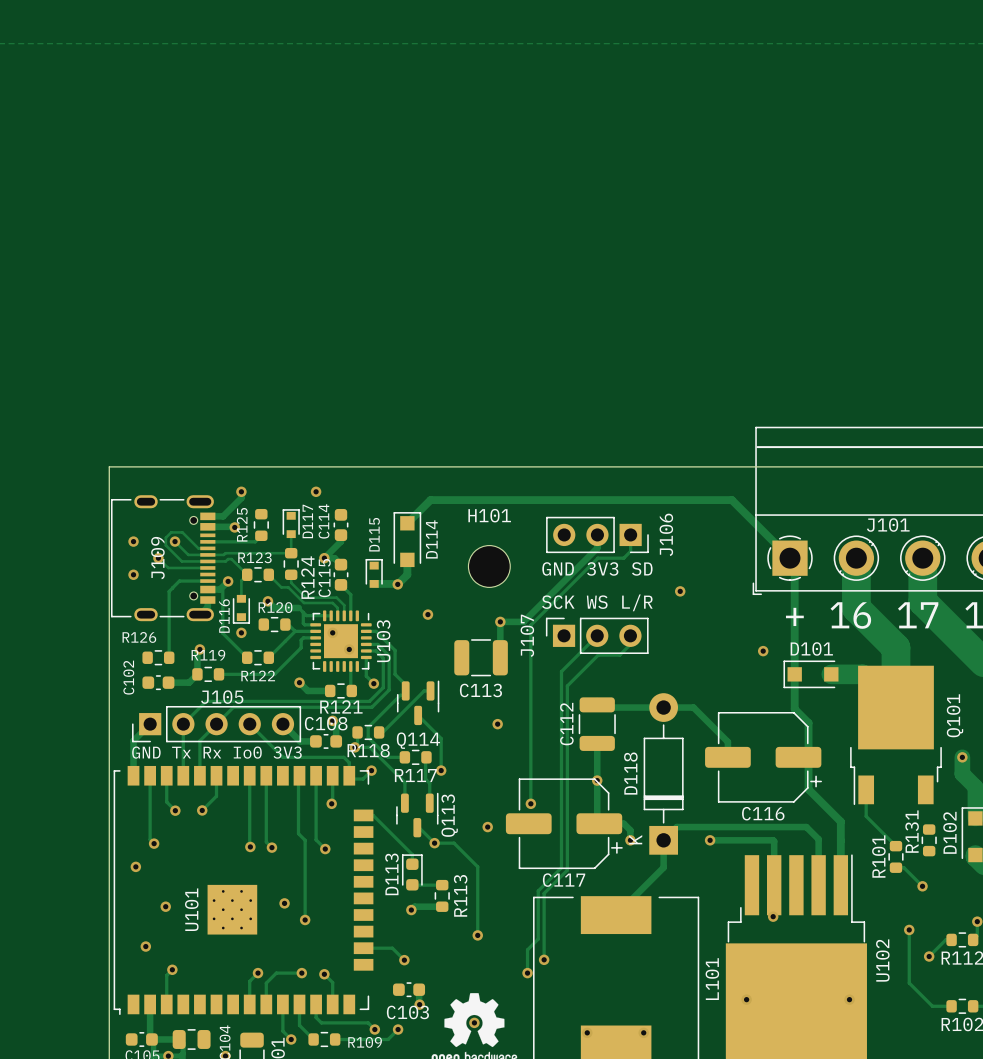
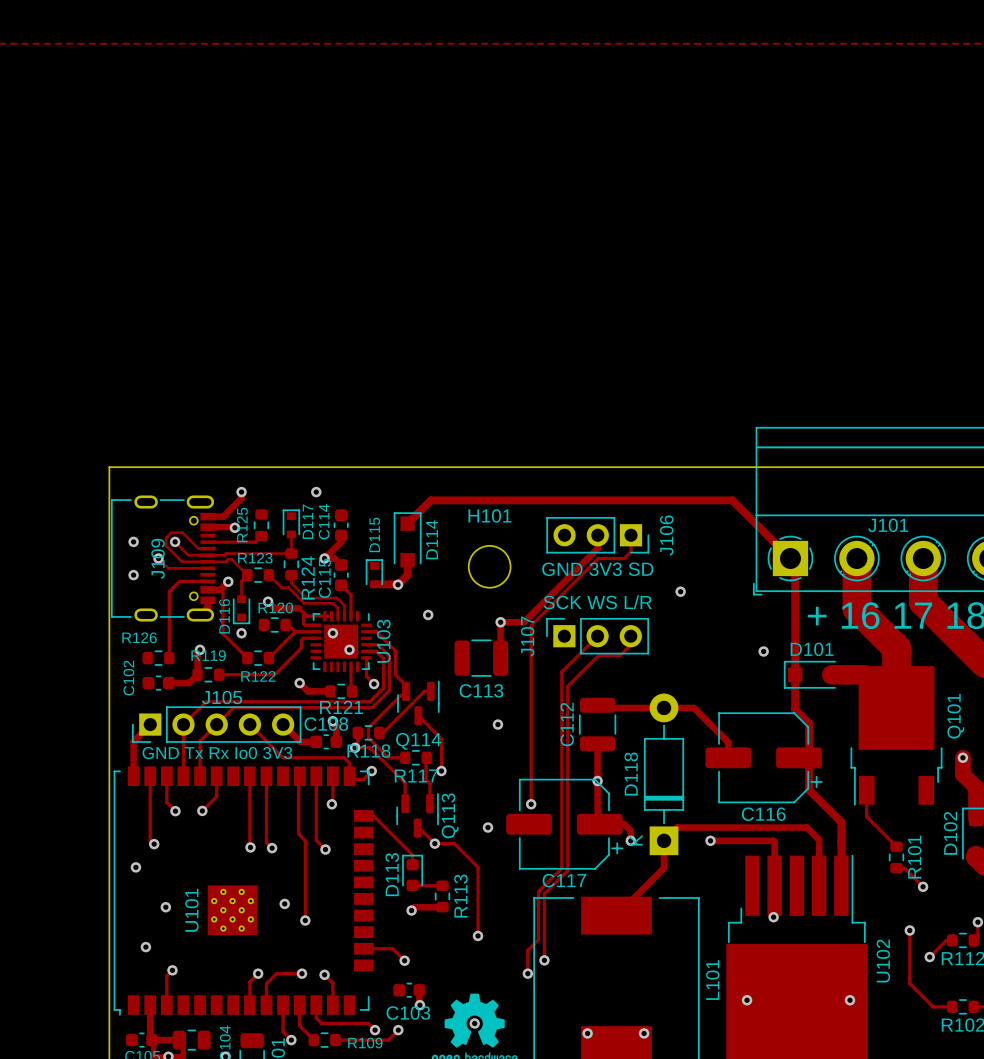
R131: (929, 840) -> none
R101 name position: R101 (878, 856) -> R101 (914, 857)

